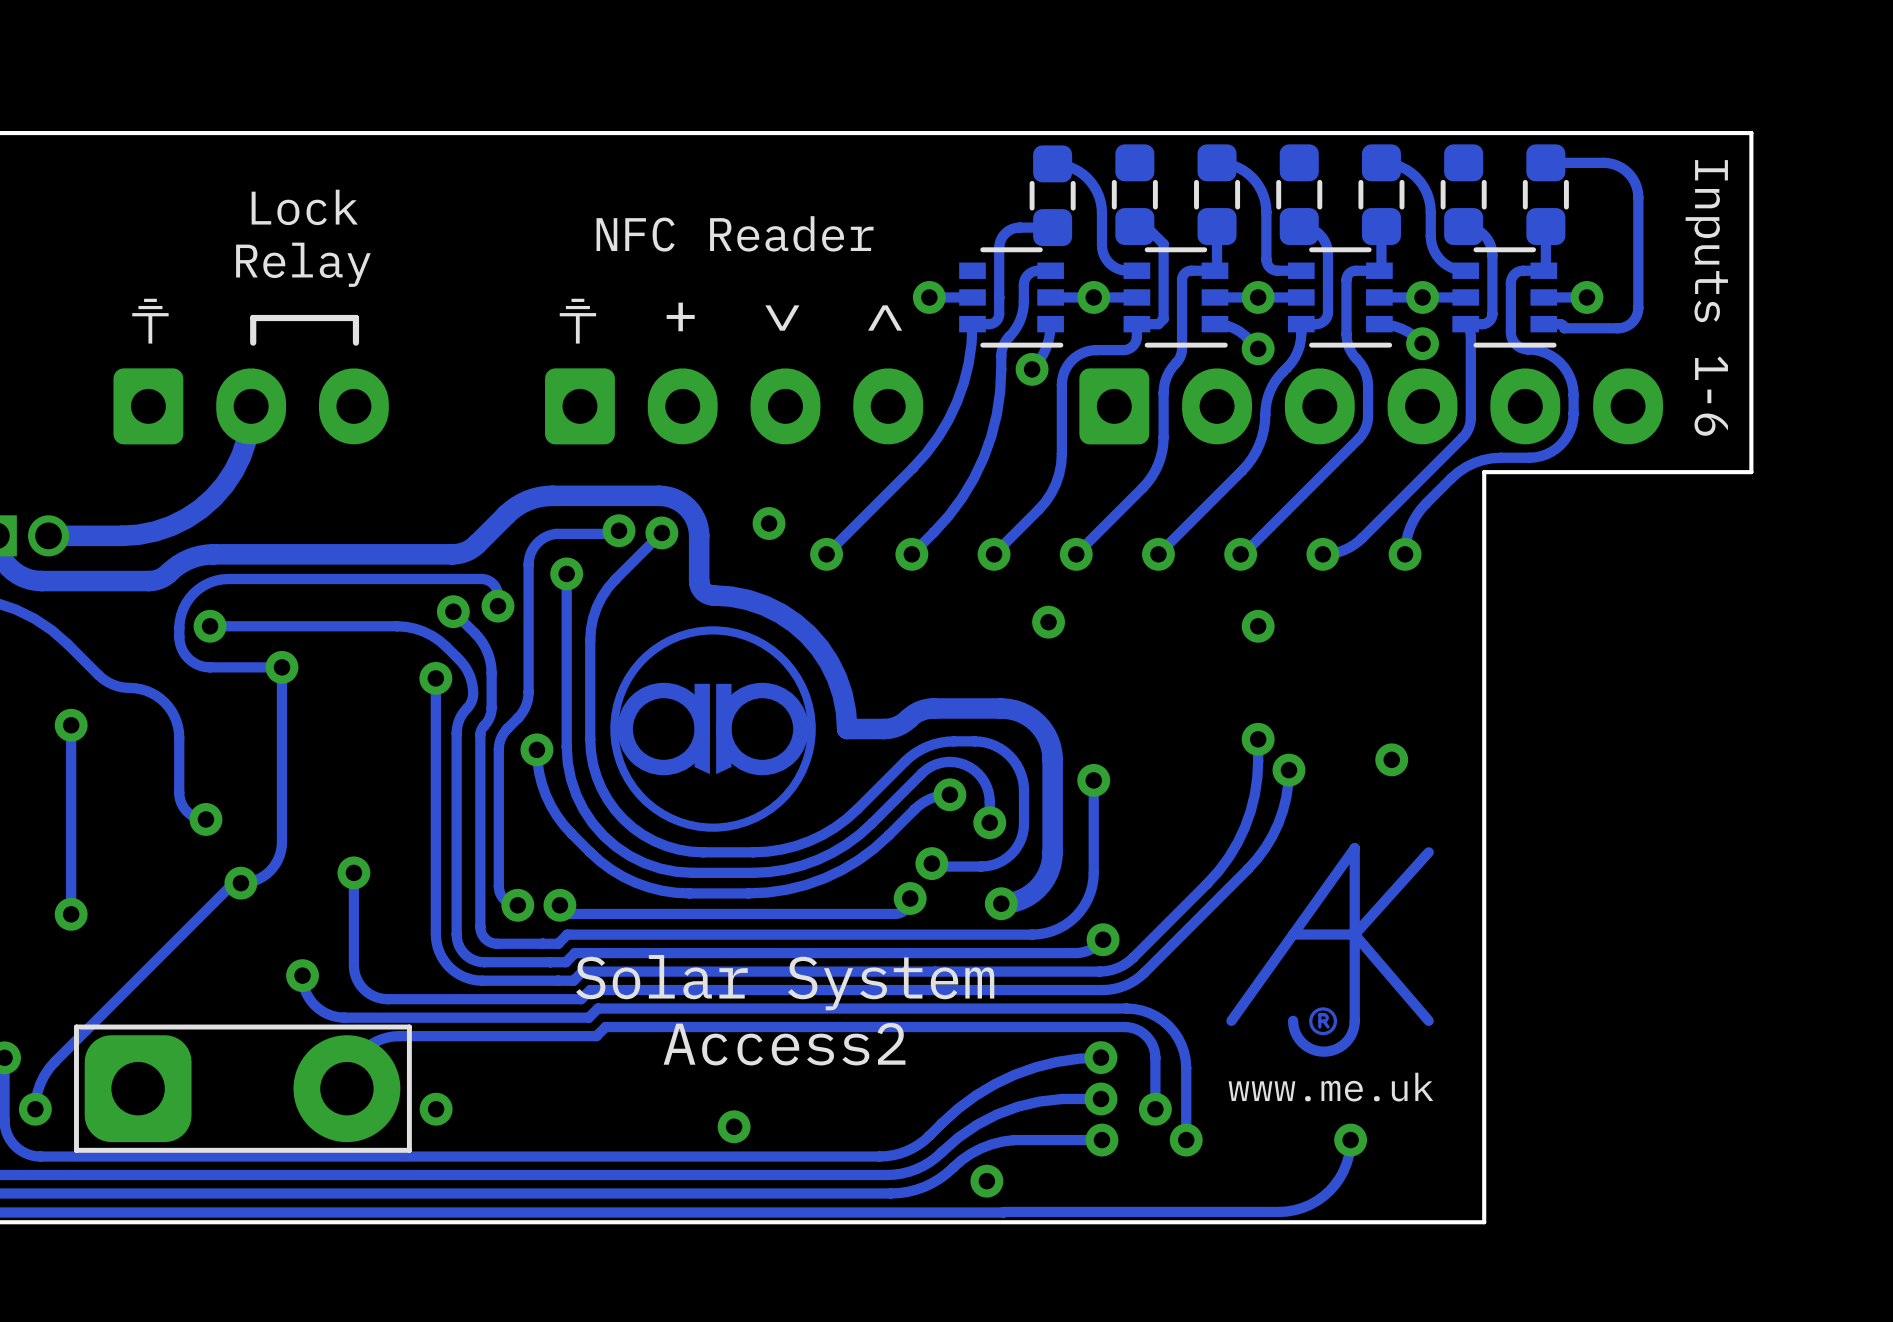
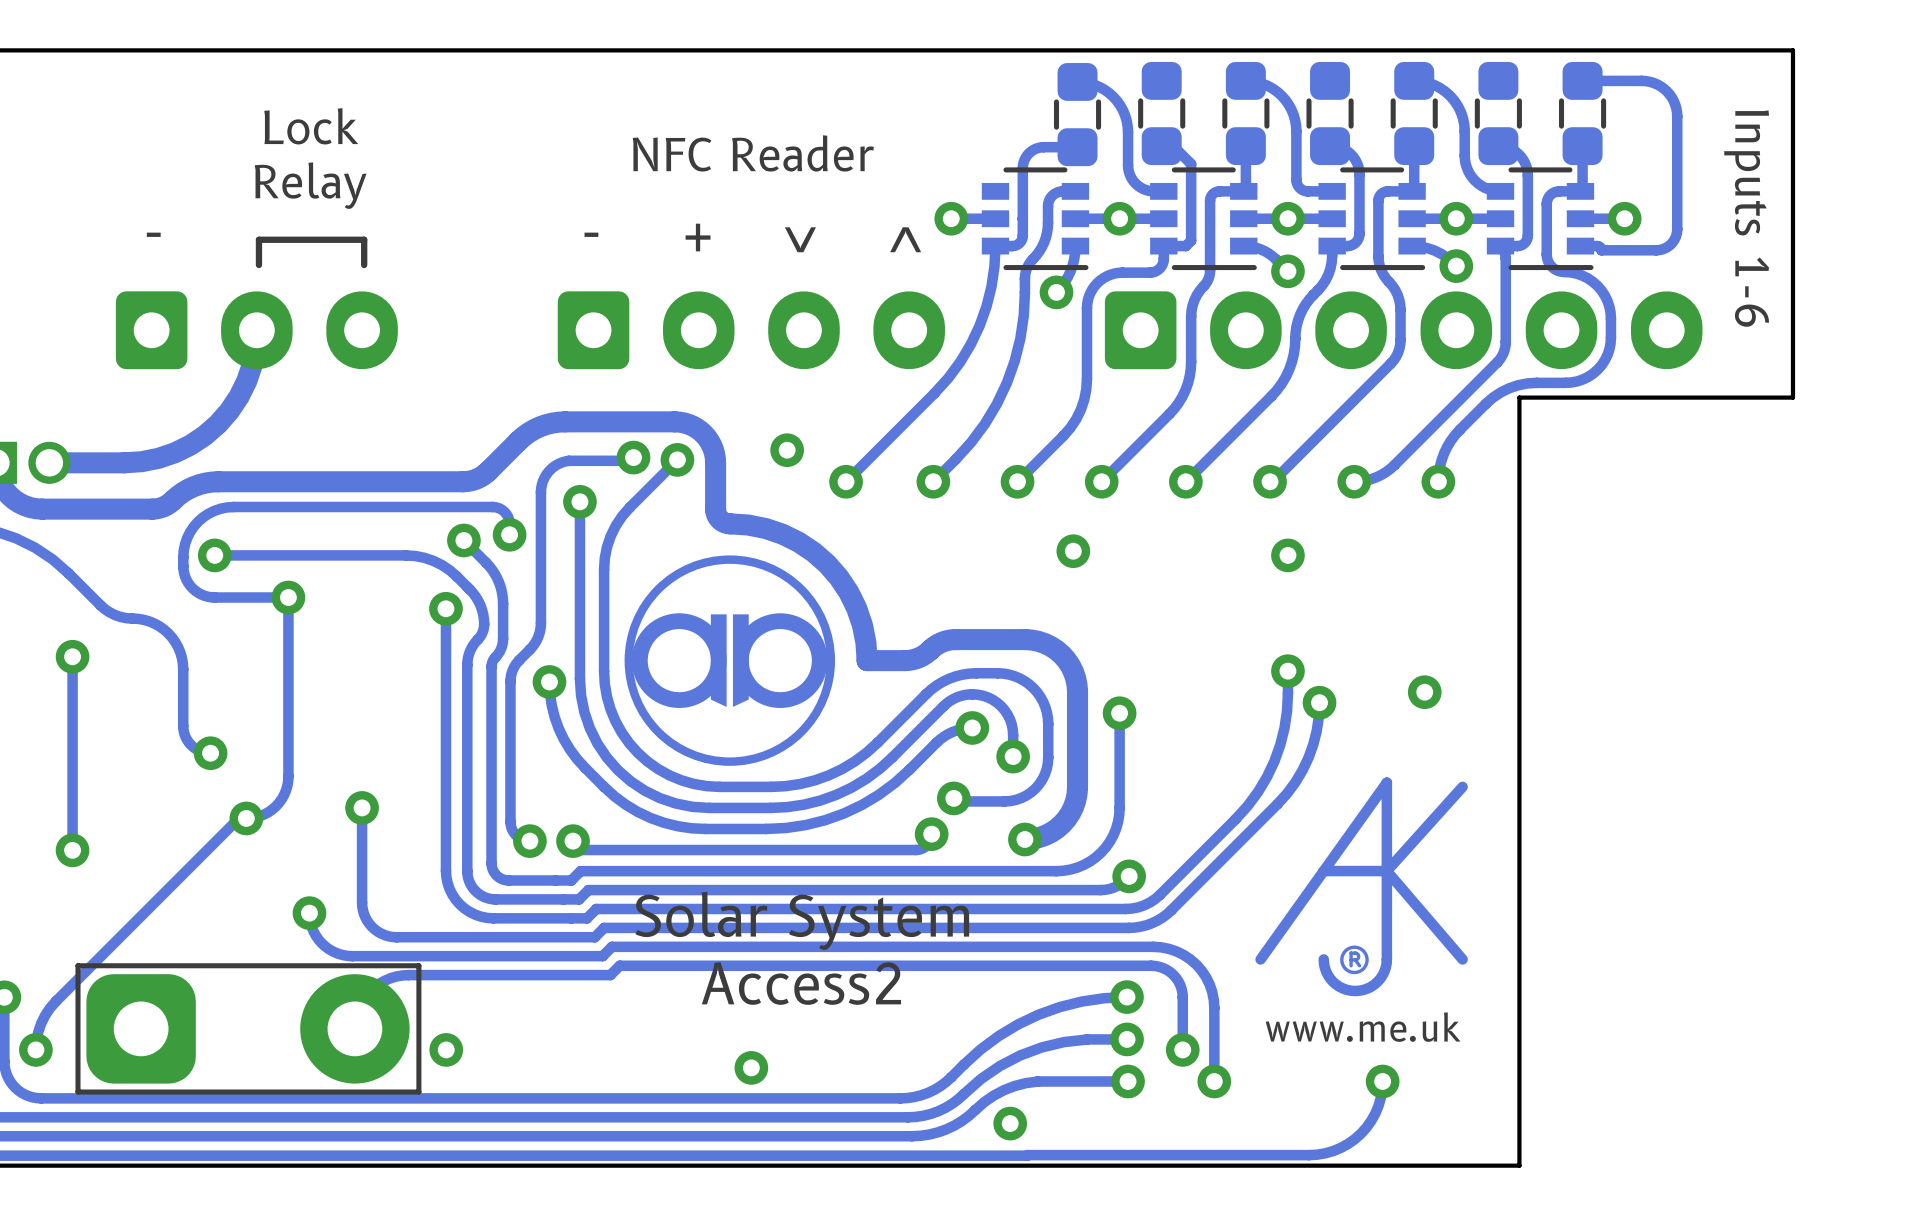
text: ⏚ (150, 321) -> - (153, 234)
text: ⏚ (577, 321) -> - (591, 234)

